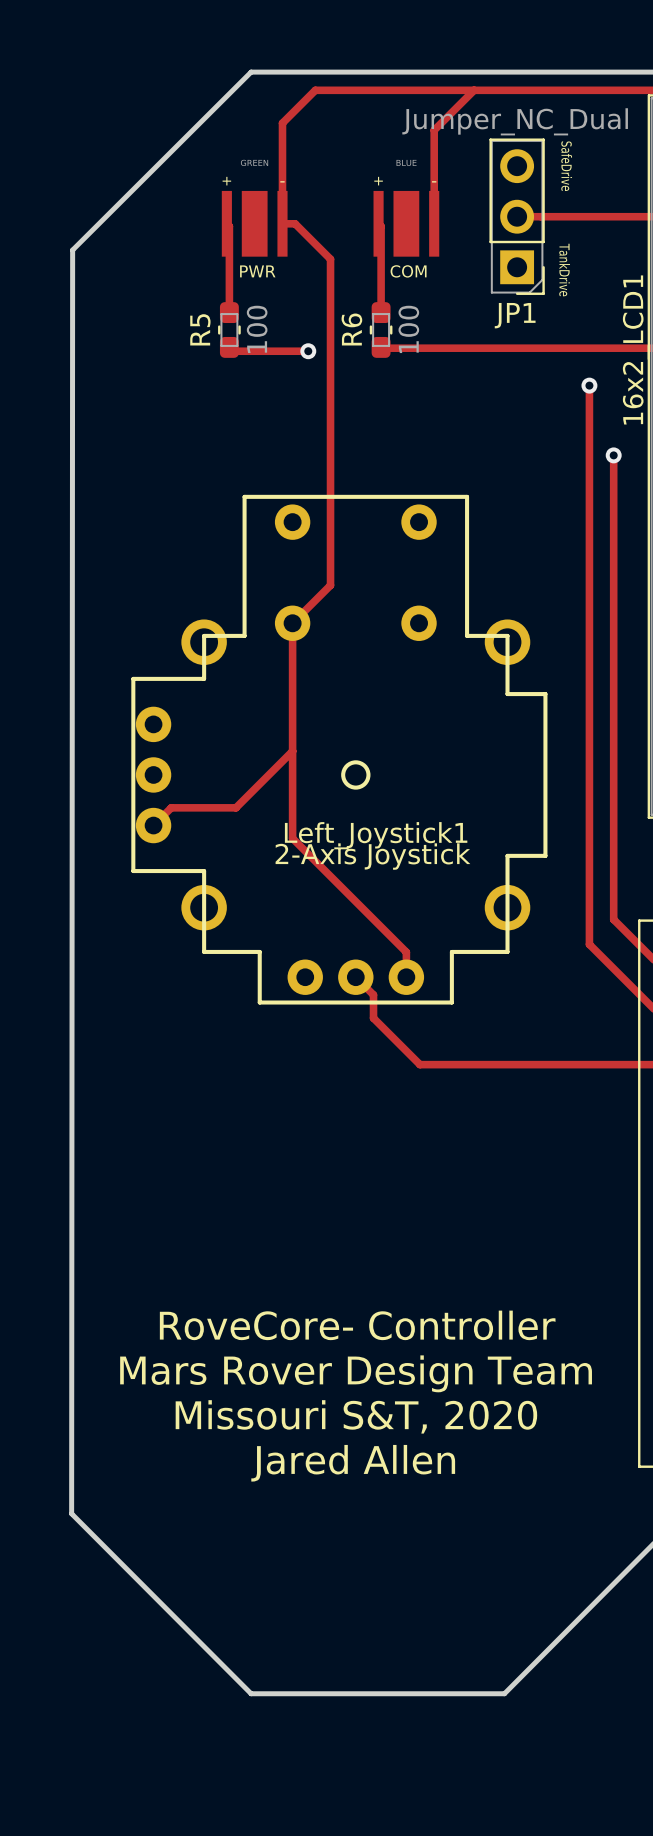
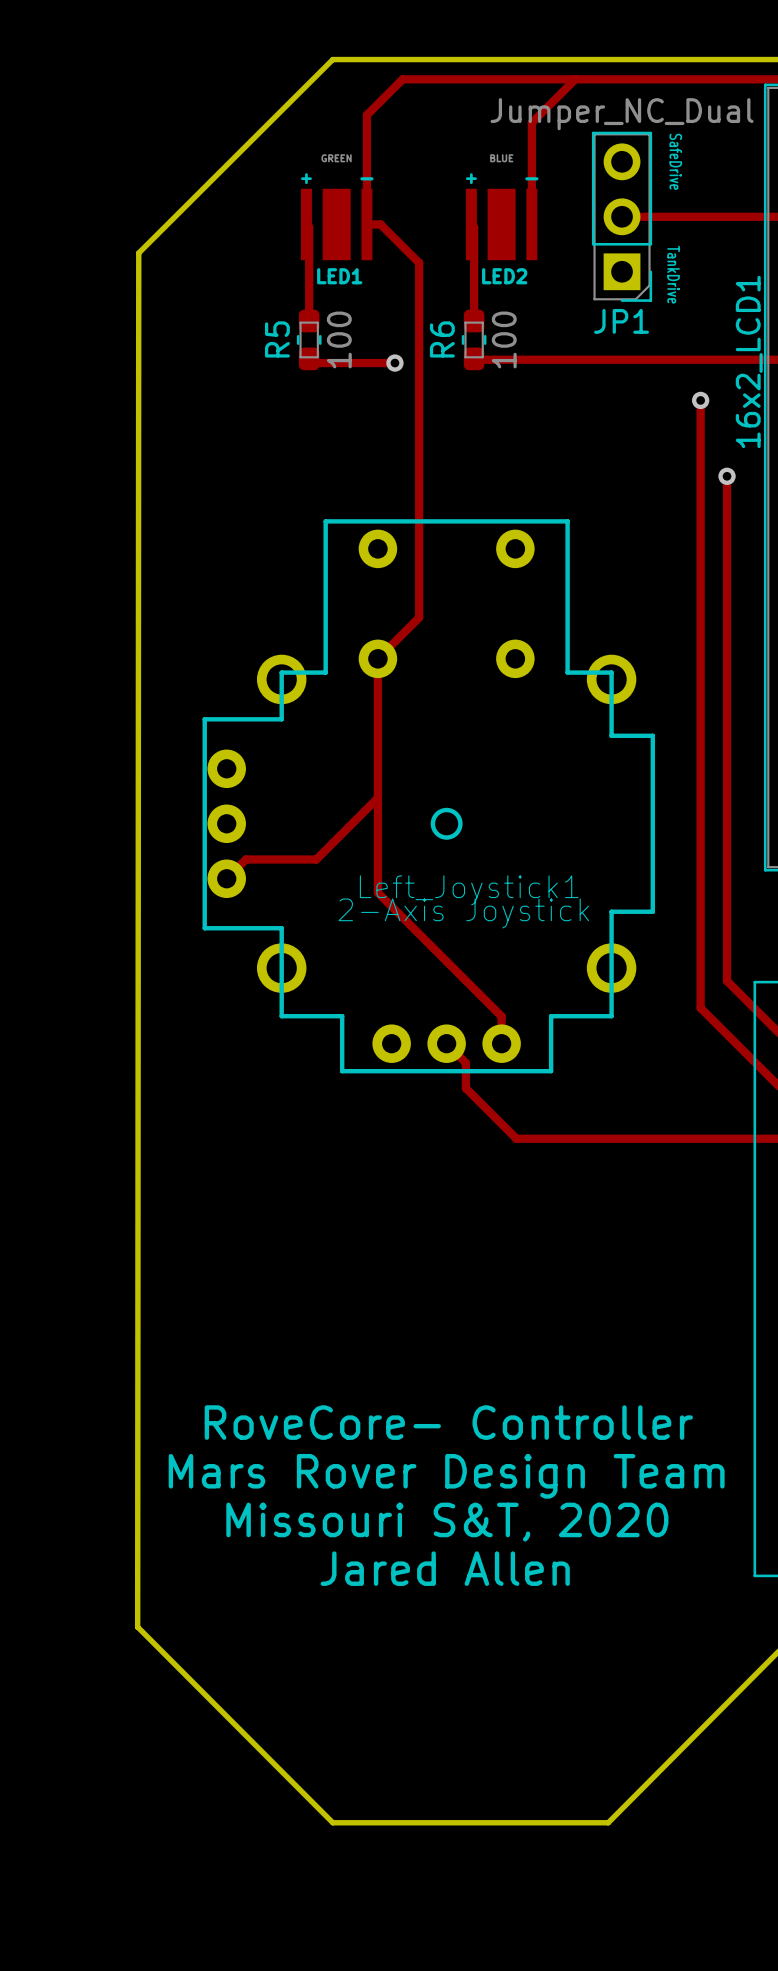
PWR name: PWR (257, 271) -> LED1 (339, 276)
COM name: COM (408, 271) -> LED2 (504, 276)

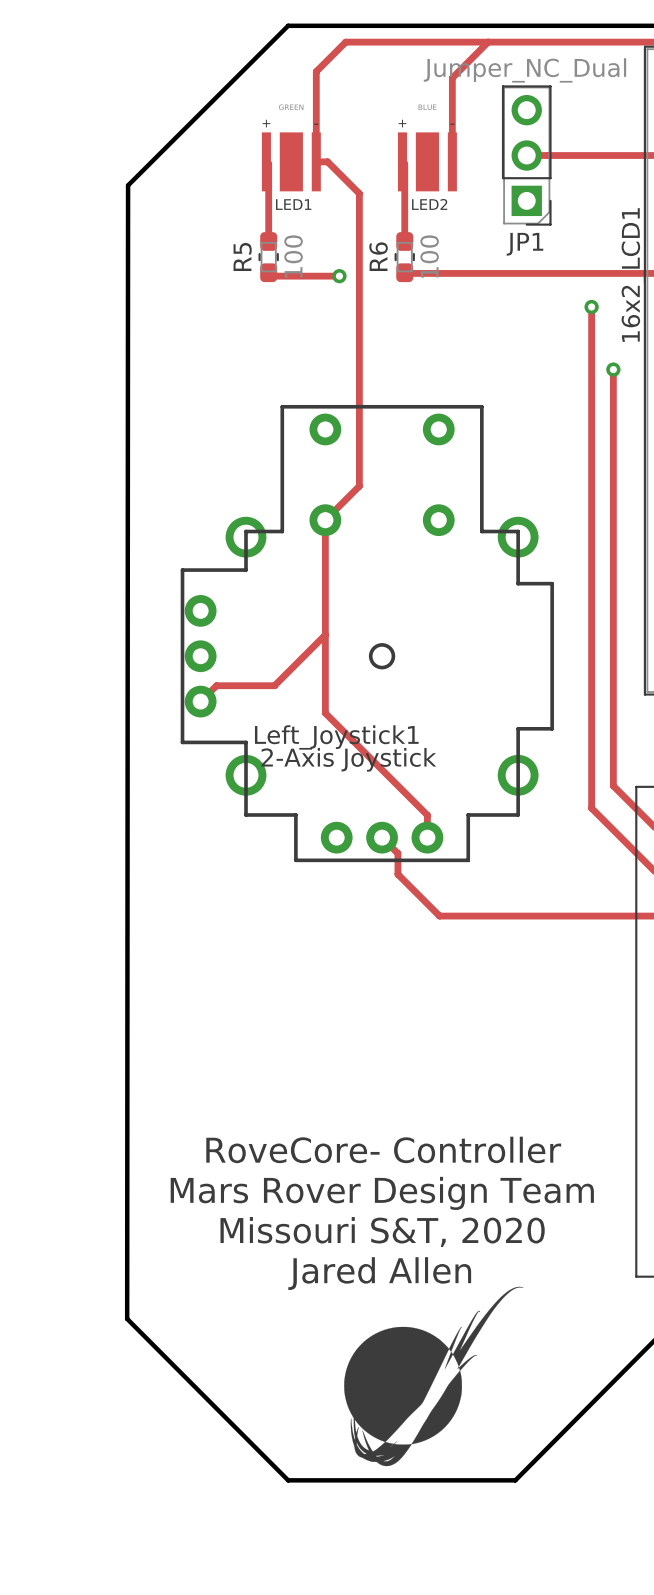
text: SafeDrive (675, 161) -> none
text: TankDrive (673, 274) -> none
Left_Joystick1 name position: Left_Joystick1 (469, 890) -> Left_Joystick1 (336, 737)
Left_Joystick1 value position: 2-Axis Joystick (463, 913) -> 2-Axis Joystick (348, 759)
drawing: none -> [344, 1286, 524, 1467]

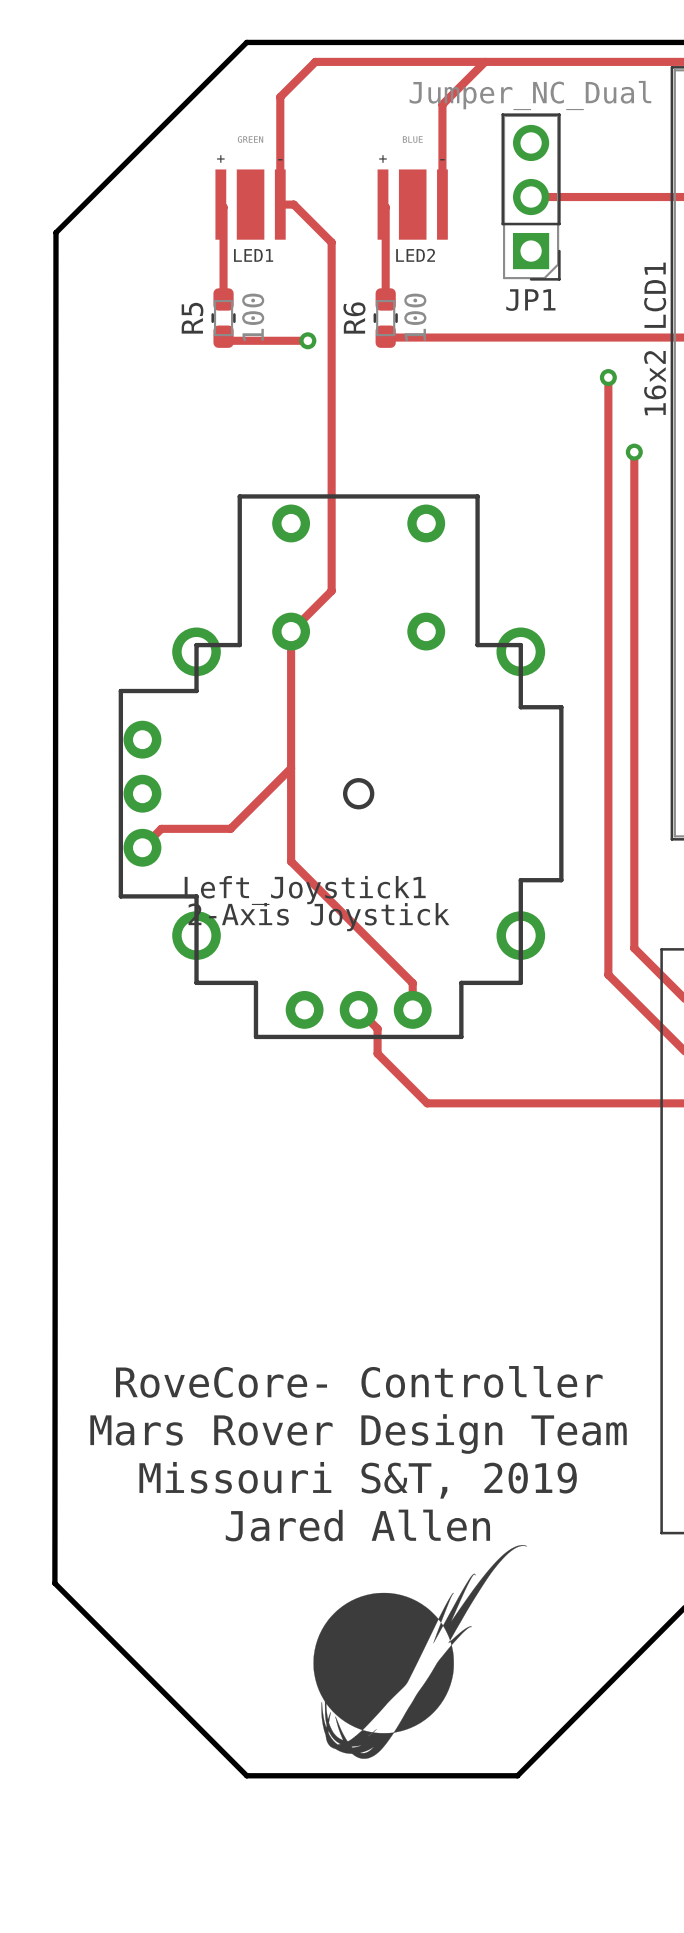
text: Missouri S&T, 2020 (382, 1232) -> Missouri S&T, 2019 (358, 1480)

